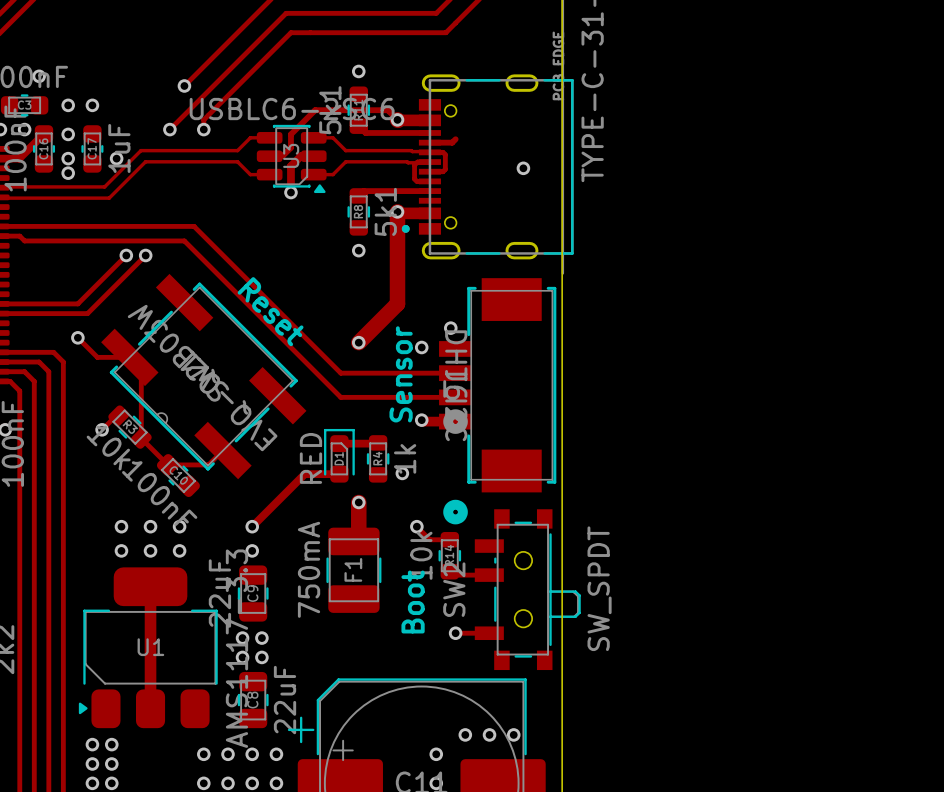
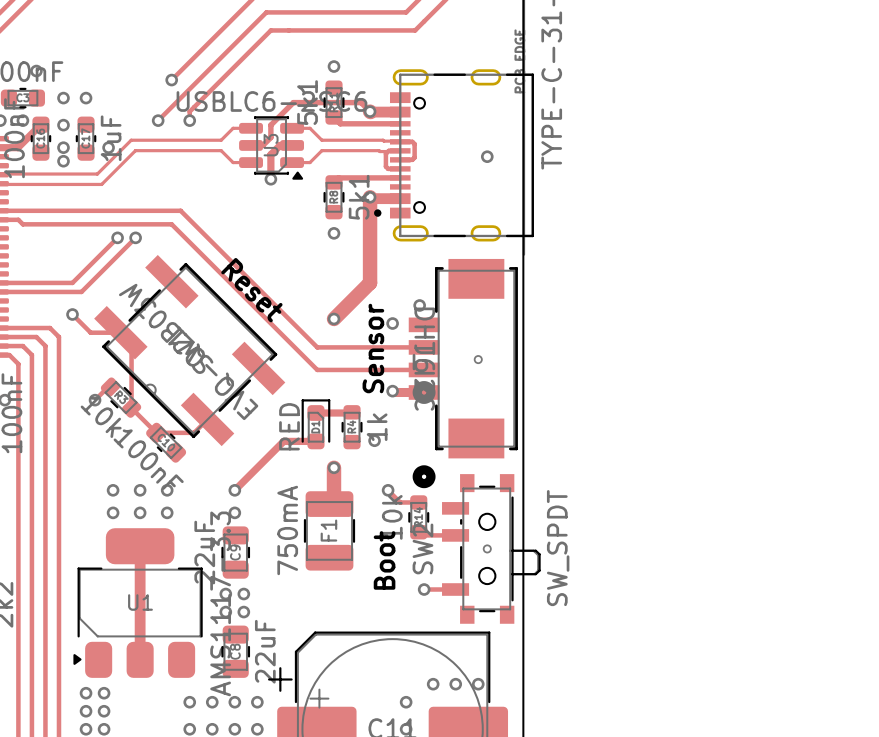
track: (455, 139) (452, 142) (429, 142) -> none
via: none -> (478, 359)
via: none -> (487, 548)

